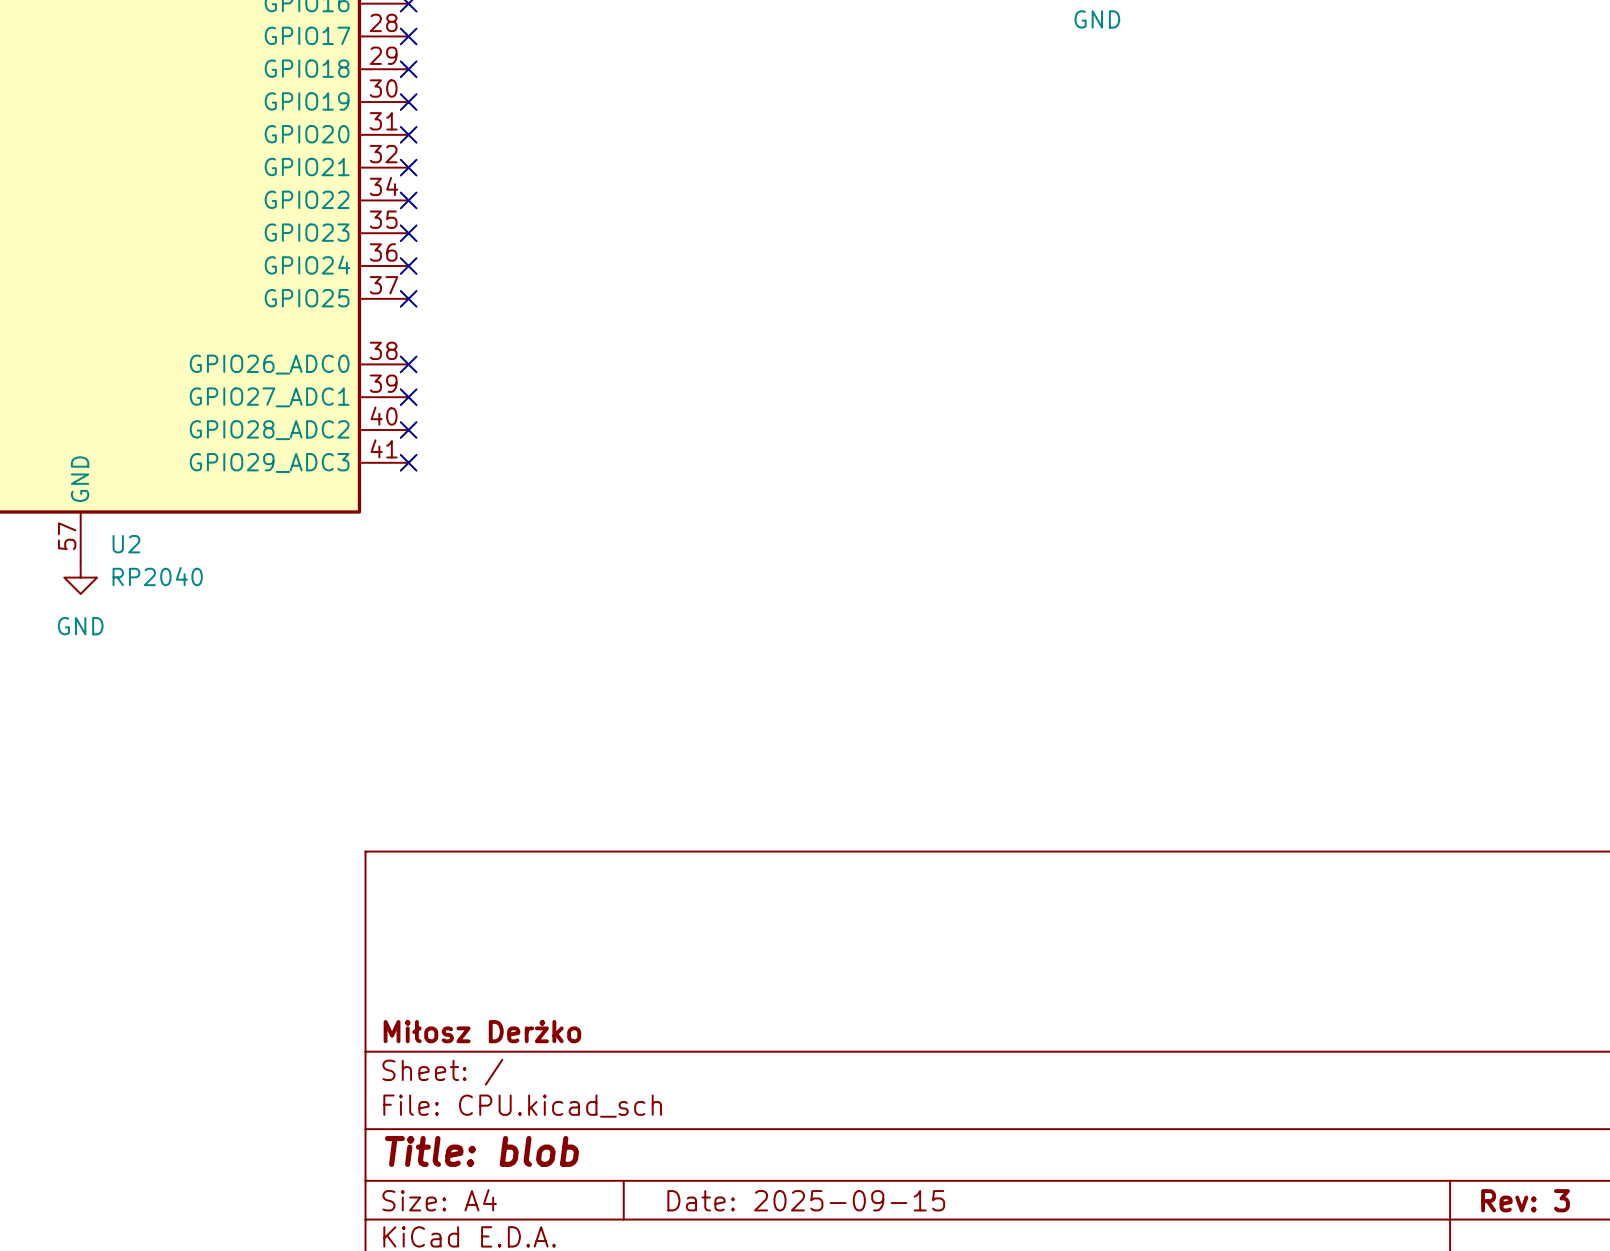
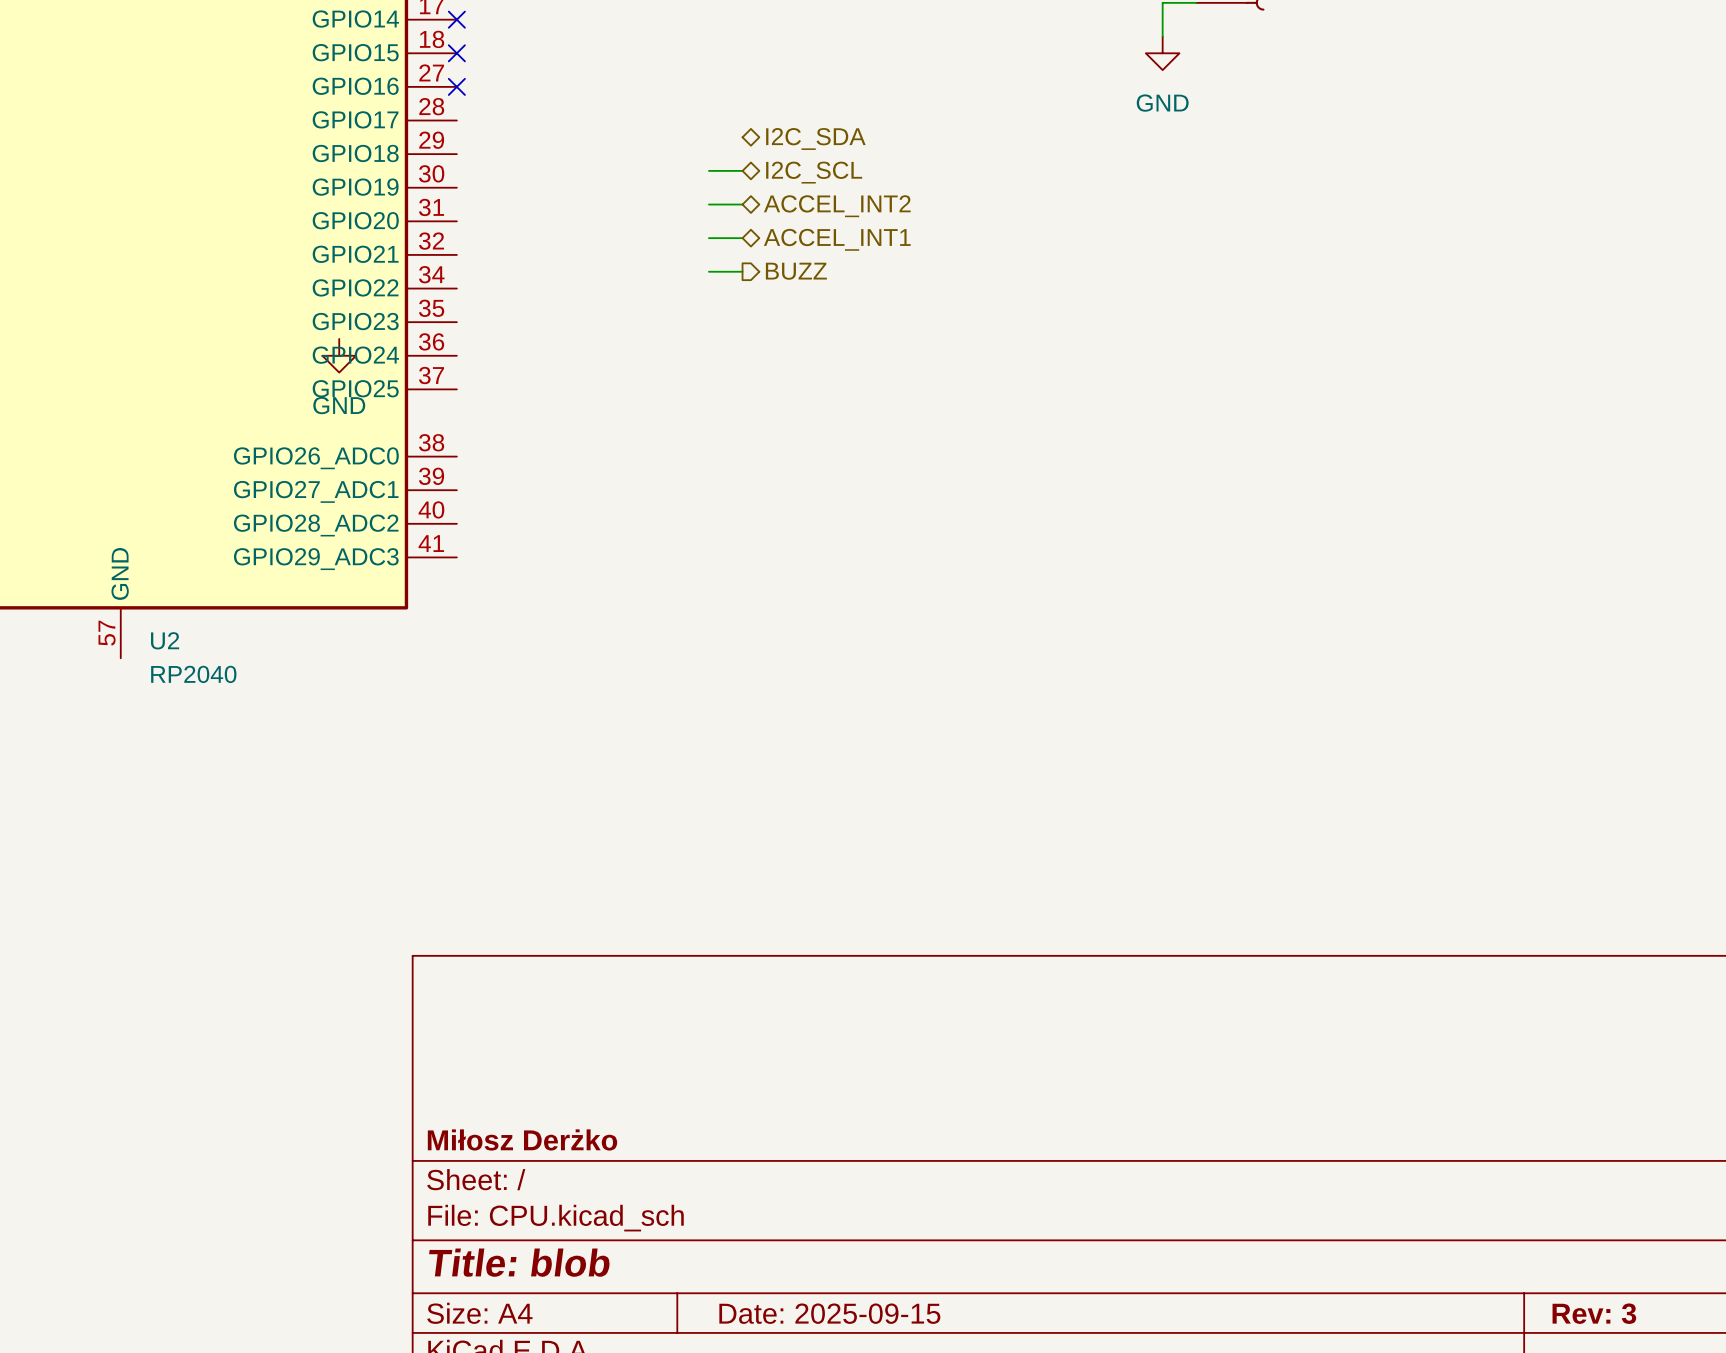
no-connect mark: (408, 36) -> none
hierarchical label: none -> I2C_SDA (815, 138)
no-connect mark: (408, 69) -> none
wire: none -> (708, 170) (742, 170)
hierarchical label: none -> I2C_SCL (814, 172)
no-connect mark: (408, 102) -> none
wire: none -> (708, 204) (742, 204)
hierarchical label: none -> ACCEL_INT2 (837, 206)
no-connect mark: (408, 134) -> none
wire: none -> (708, 238) (742, 238)
hierarchical label: none -> ACCEL_INT1 (837, 239)
no-connect mark: (408, 167) -> none
hierarchical label: none -> BUZZ (796, 271)
wire: none -> (708, 271) (742, 271)
no-connect mark: (408, 200) -> none
no-connect mark: (408, 233) -> none
power symbol: none -> GND (339, 355)
no-connect mark: (408, 266) -> none
no-connect mark: (408, 298) -> none
no-connect mark: (408, 364) -> none
no-connect mark: (408, 397) -> none
no-connect mark: (408, 430) -> none
no-connect mark: (408, 462) -> none
power symbol: GND (80, 577) -> none

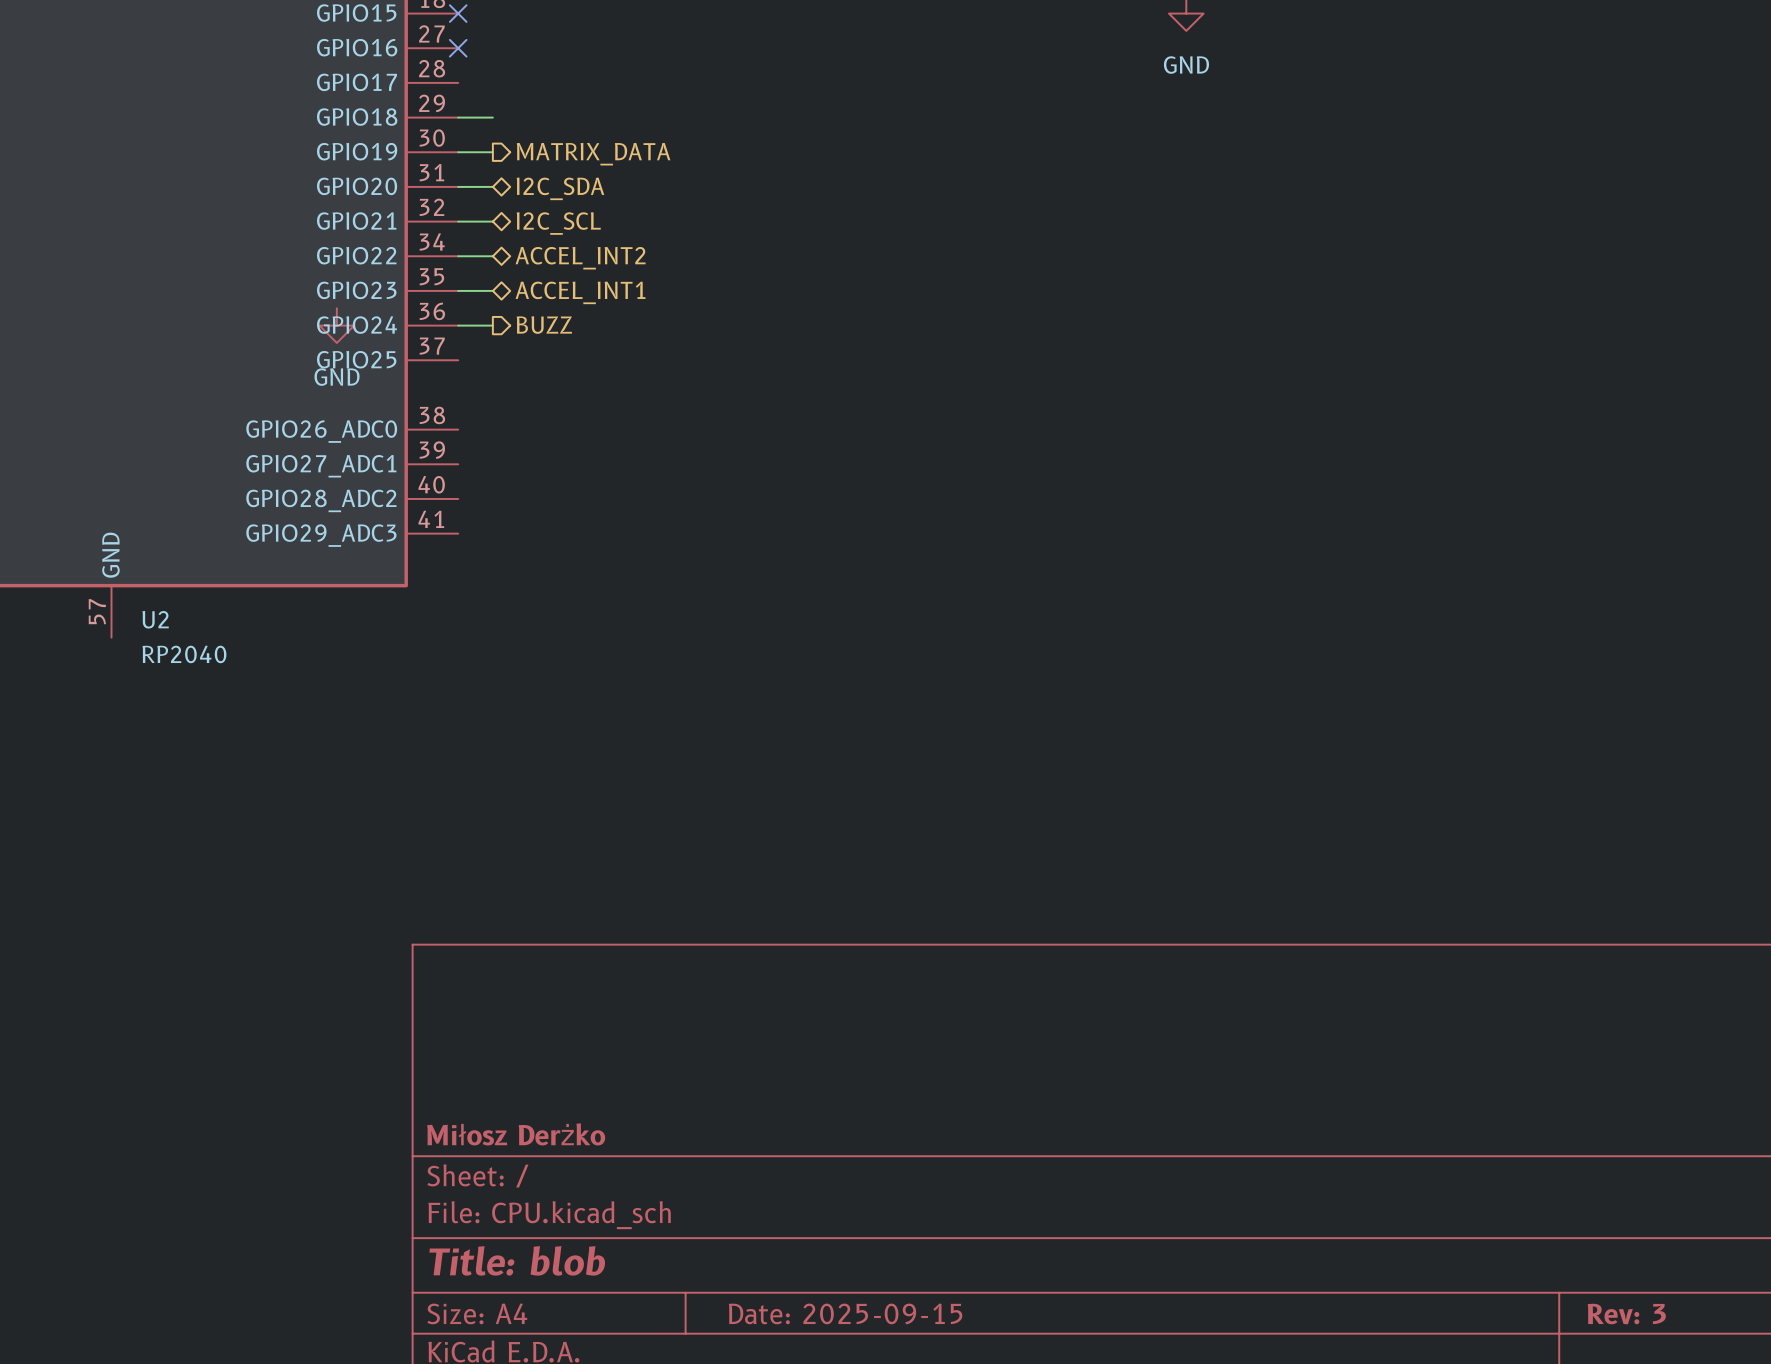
hierarchical label position: I2C_SDA (815, 138) -> I2C_SDA (560, 188)
wire: (708, 170) (742, 170) -> (458, 117) (492, 117)
hierarchical label position: I2C_SCL (814, 172) -> I2C_SCL (558, 223)
hierarchical label: none -> MATRIX_DATA (593, 154)
wire: (708, 204) (742, 204) -> (458, 152) (492, 152)
hierarchical label position: ACCEL_INT2 (837, 206) -> ACCEL_INT2 (580, 258)
wire: (708, 238) (742, 238) -> (458, 186) (492, 186)
hierarchical label position: ACCEL_INT1 (837, 239) -> ACCEL_INT1 (580, 292)
wire: (708, 271) (742, 271) -> (458, 221) (492, 221)
hierarchical label position: BUZZ (796, 271) -> BUZZ (544, 325)
wire: none -> (458, 256) (492, 256)
wire: none -> (458, 290) (492, 290)
wire: none -> (458, 325) (492, 325)

